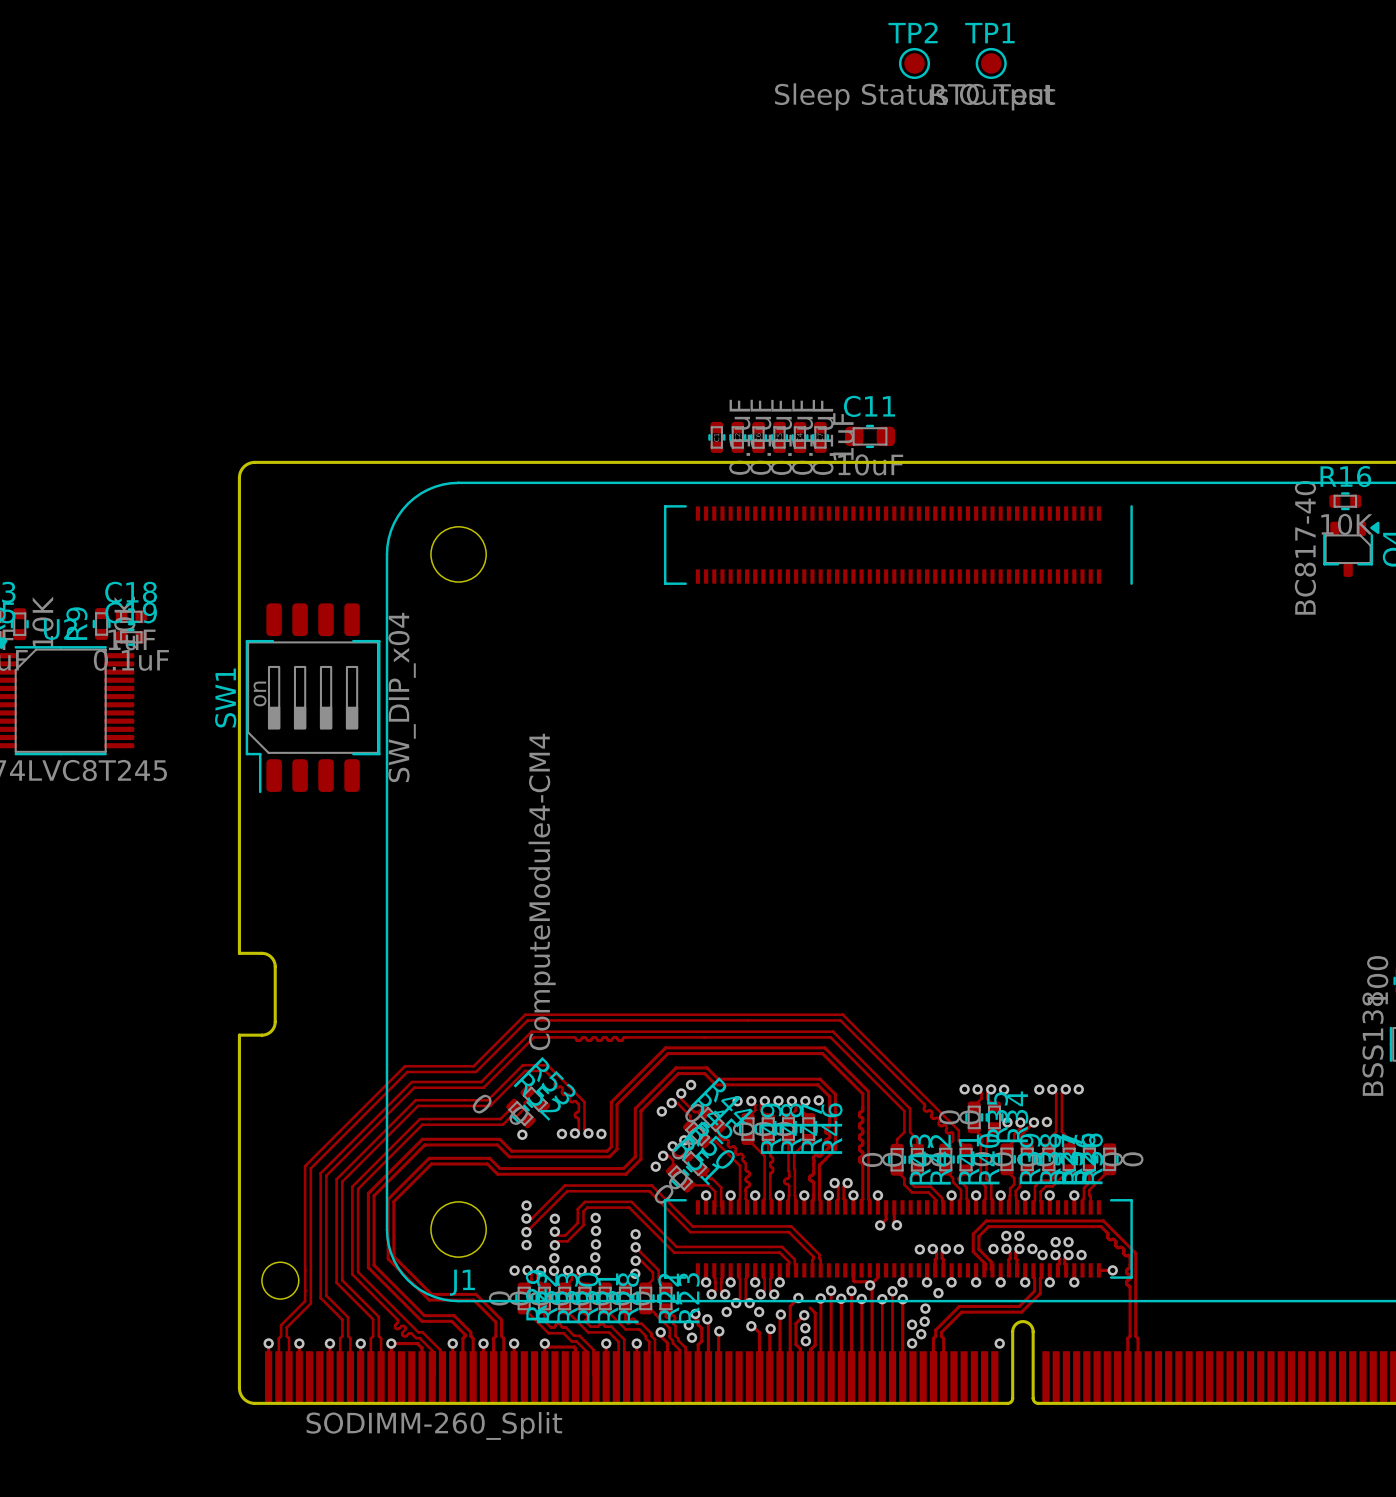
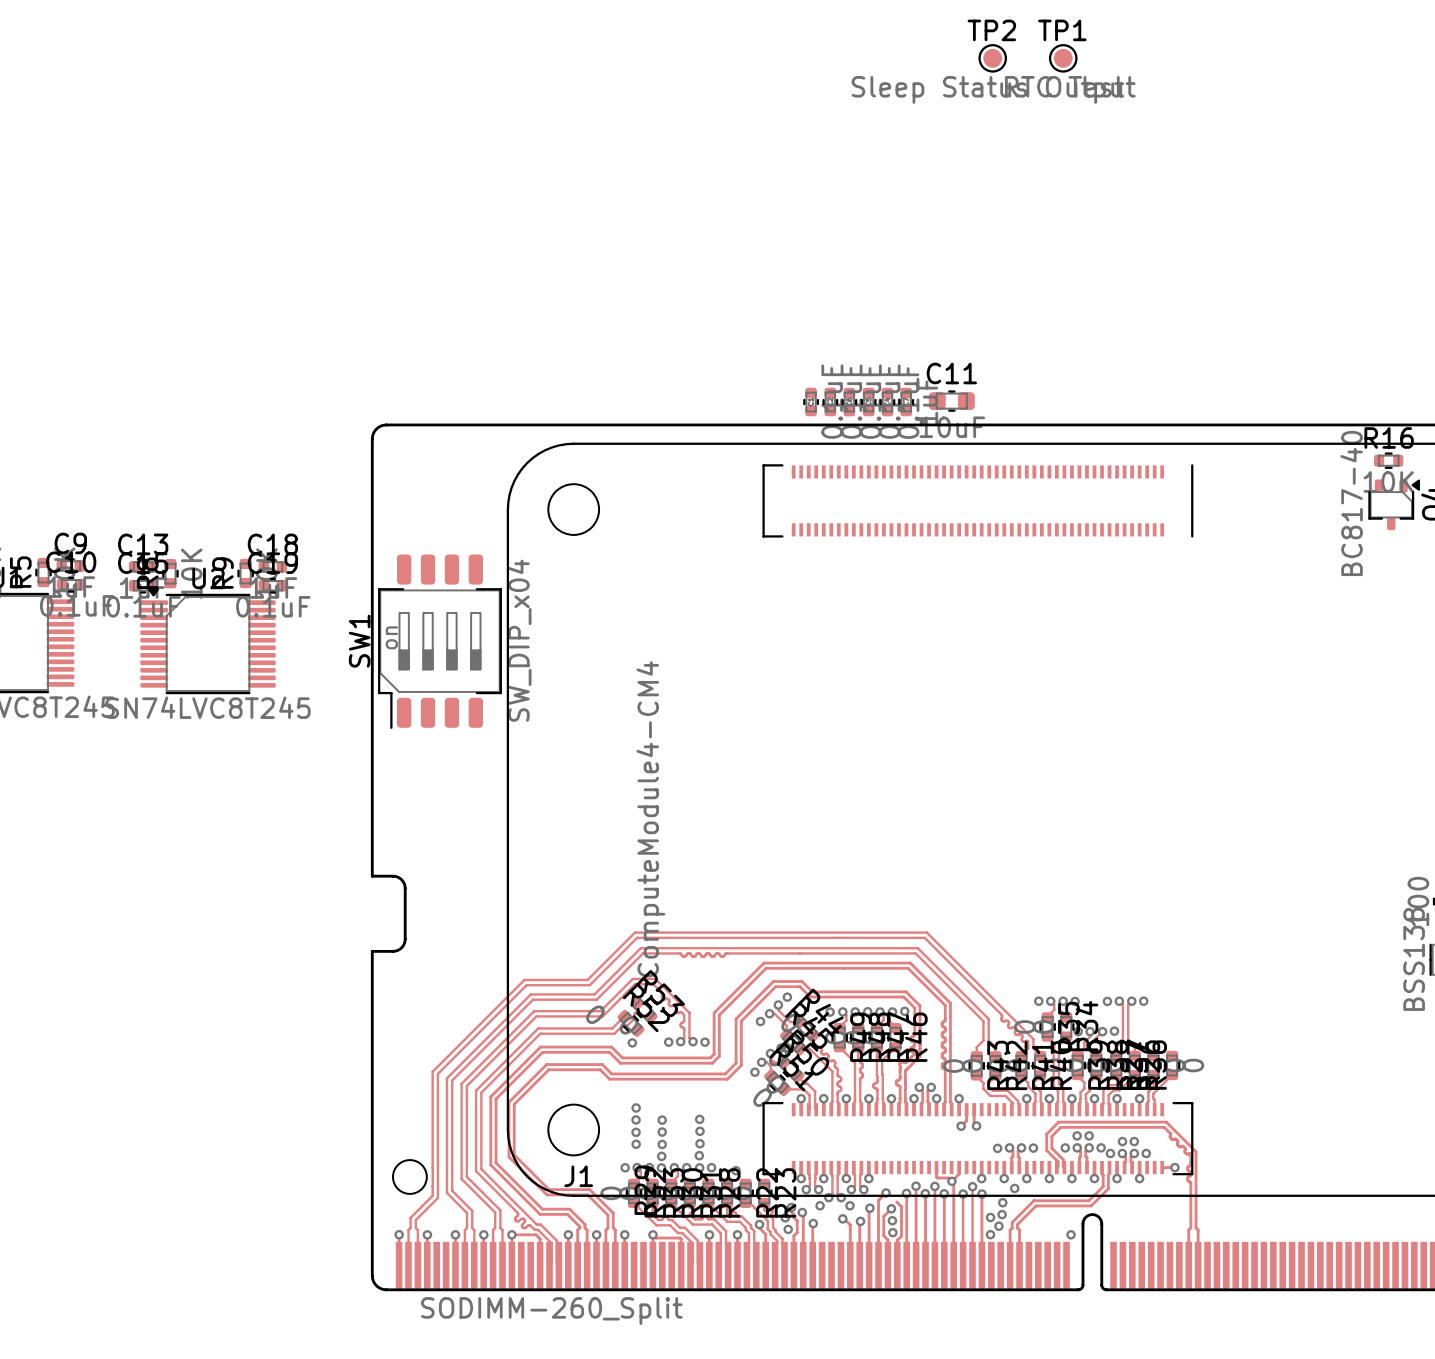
track: (526, 1218) (531, 1218) (564, 1185) (651, 1185) (692, 1226) (791, 1226) (819, 1254) (820, 1270) -> none
track: (554, 1231) (558, 1235) (565, 1235) (577, 1223) (577, 1209) (585, 1201) (631, 1201) (676, 1246) (782, 1246) (794, 1259) (796, 1270) -> none
track: (526, 1232) (567, 1191) (649, 1191) (690, 1232) (788, 1232) (813, 1256) (812, 1270) -> none
via: (635, 1234) -> none
track: (554, 1245) (558, 1241) (567, 1241) (583, 1225) (583, 1211) (587, 1207) (629, 1207) (674, 1252) (779, 1252) (789, 1262) (787, 1270) -> none
track: (635, 1247) (658, 1270) (658, 1279) (665, 1288) -> none
via: (635, 1247) -> none
track: (635, 1260) (641, 1260) (652, 1272) (652, 1279) (645, 1288) -> none
via: (635, 1260) -> none
via: none -> (711, 1167)

